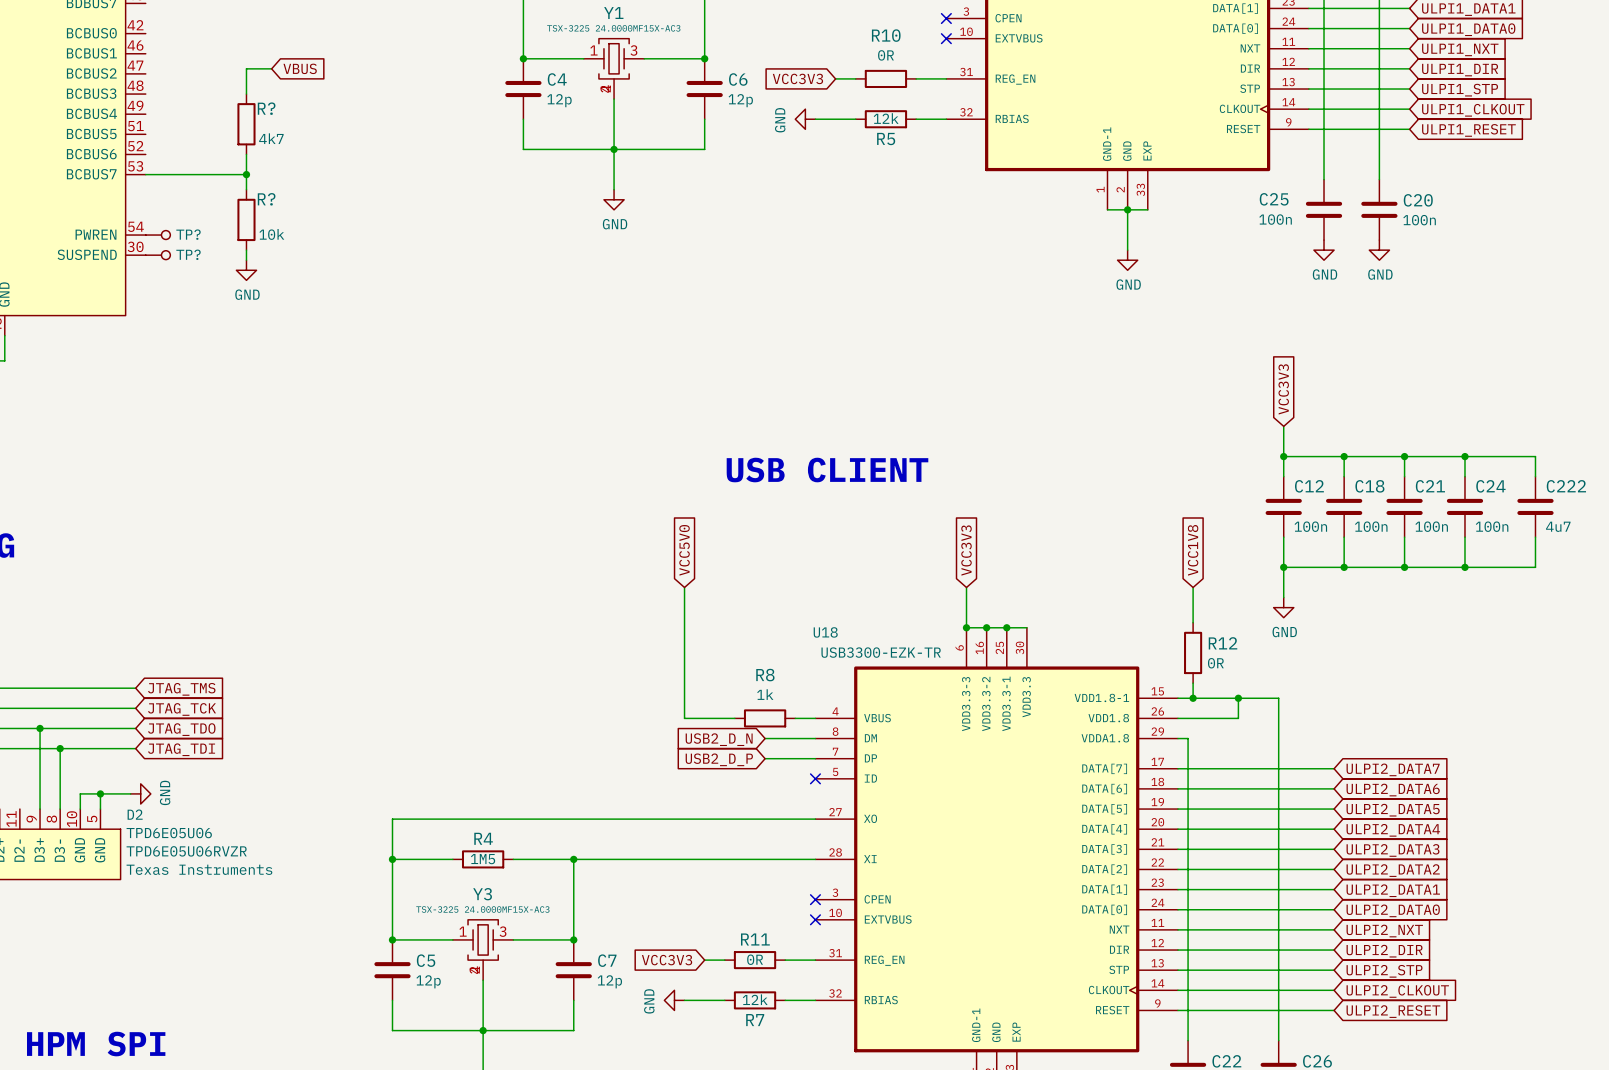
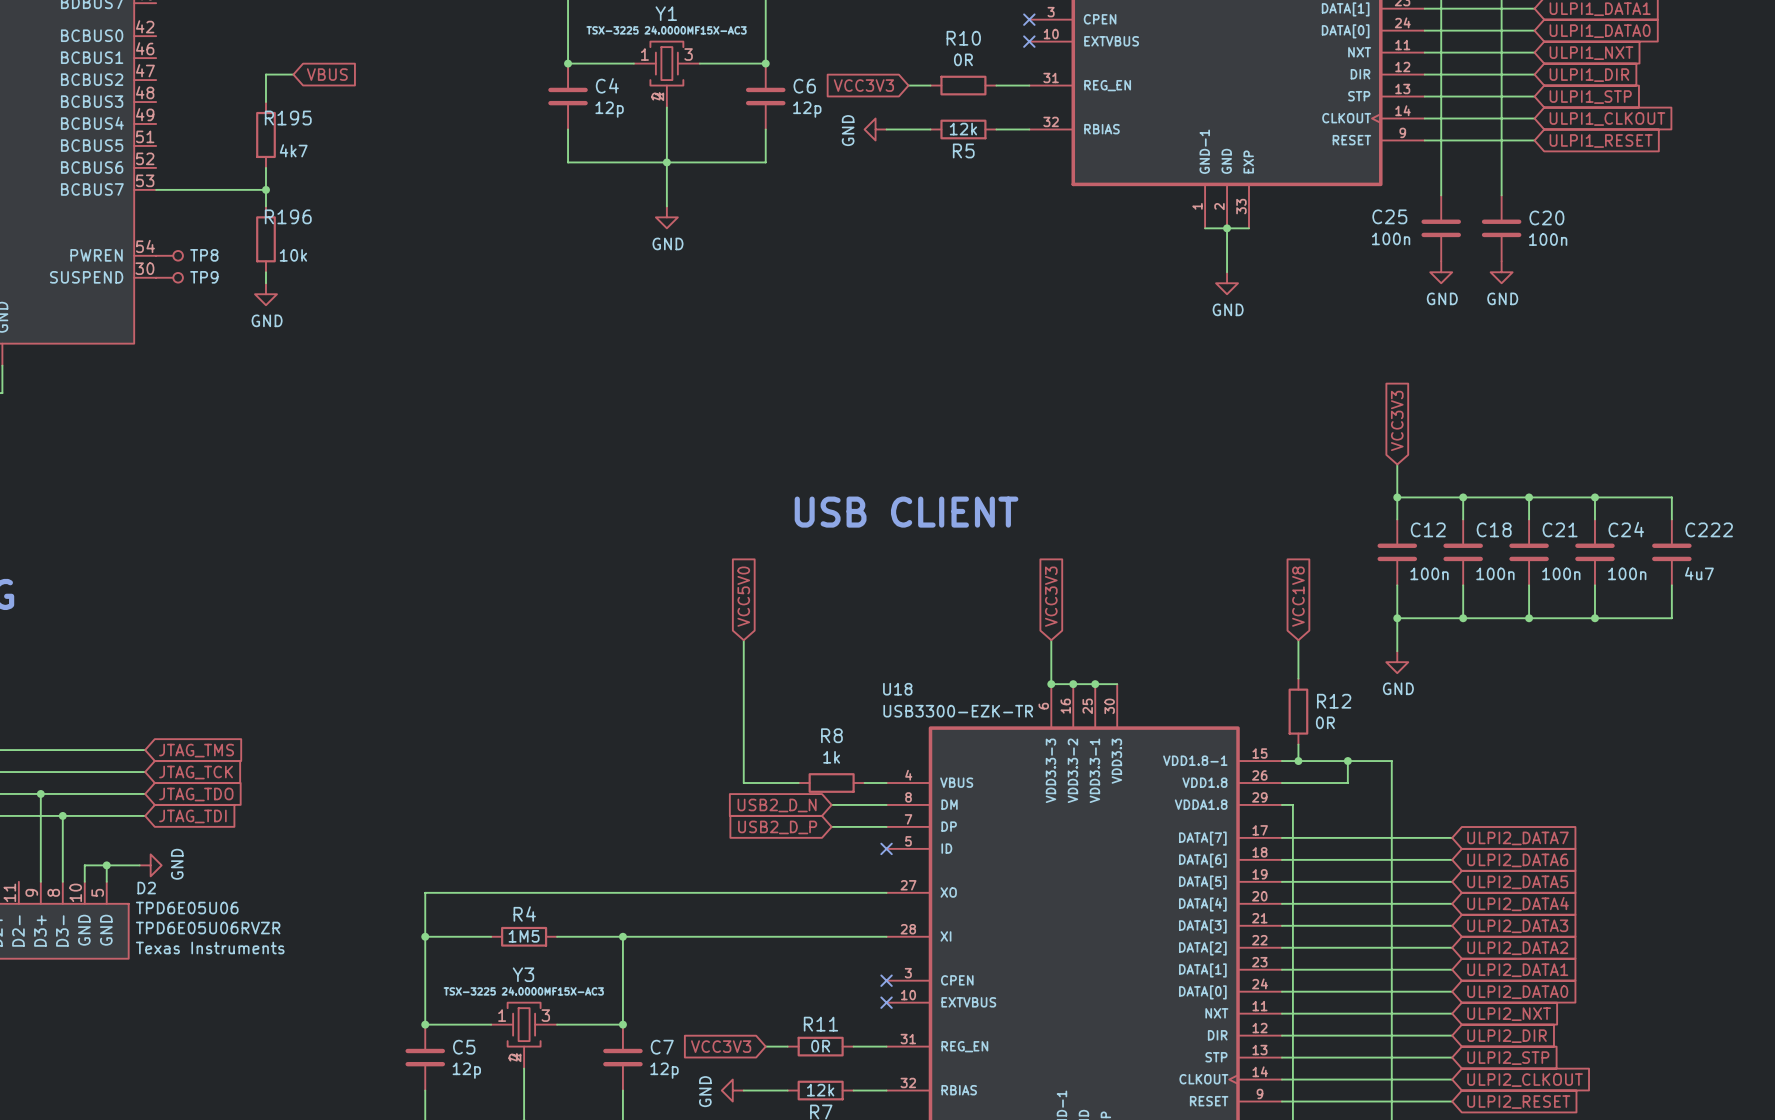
R? name: R? (266, 108) -> R195 (288, 118)
R? name: R? (266, 199) -> R196 (288, 216)
TP? name: TP? (188, 234) -> TP8 (204, 255)
TP? name: TP? (188, 254) -> TP9 (204, 277)

